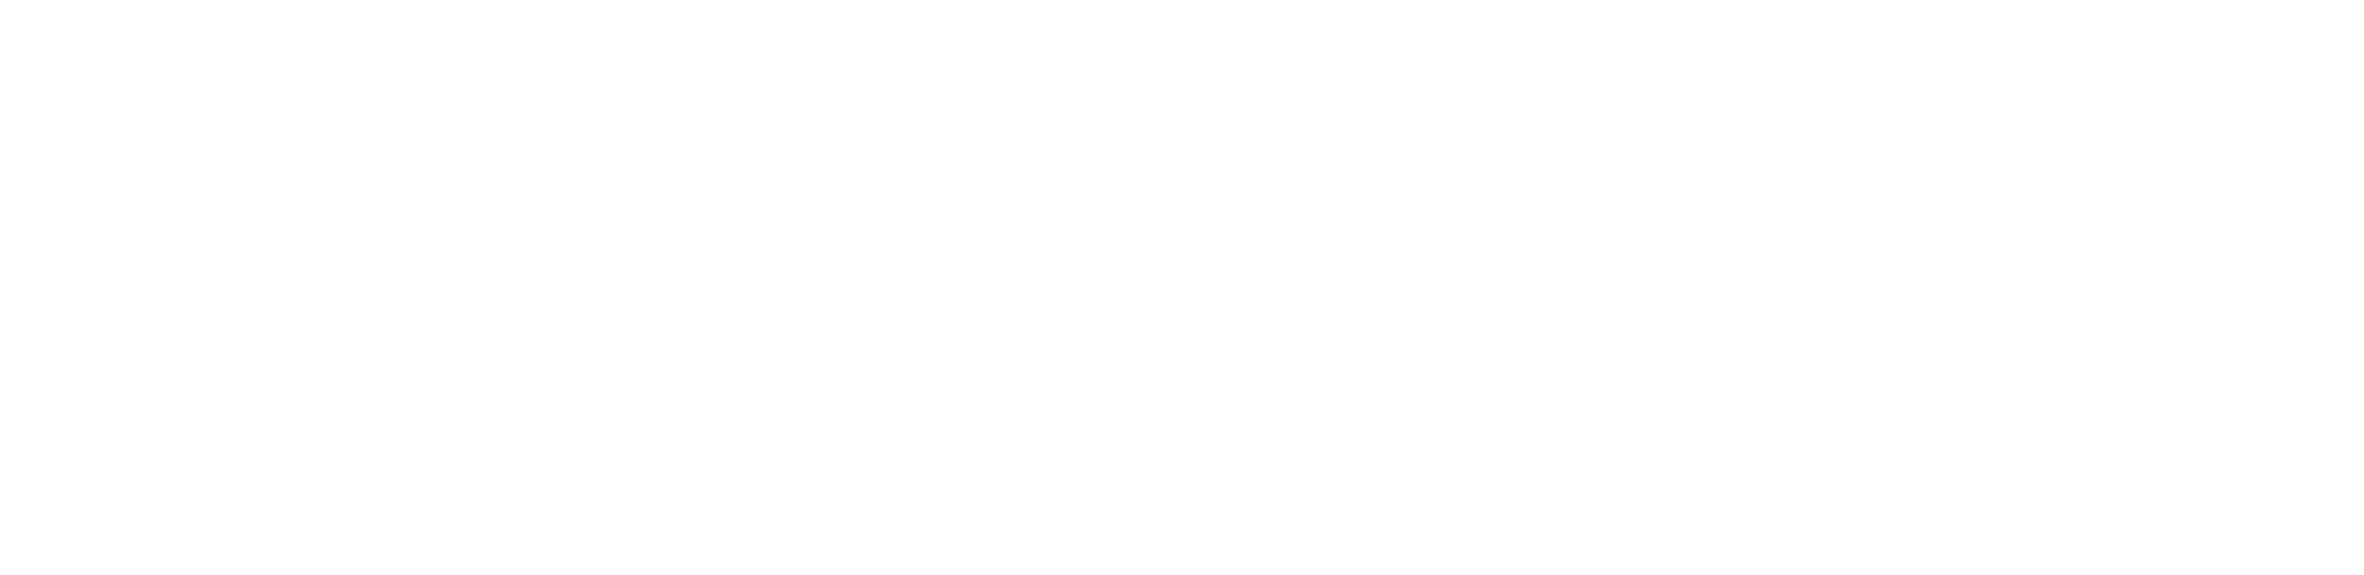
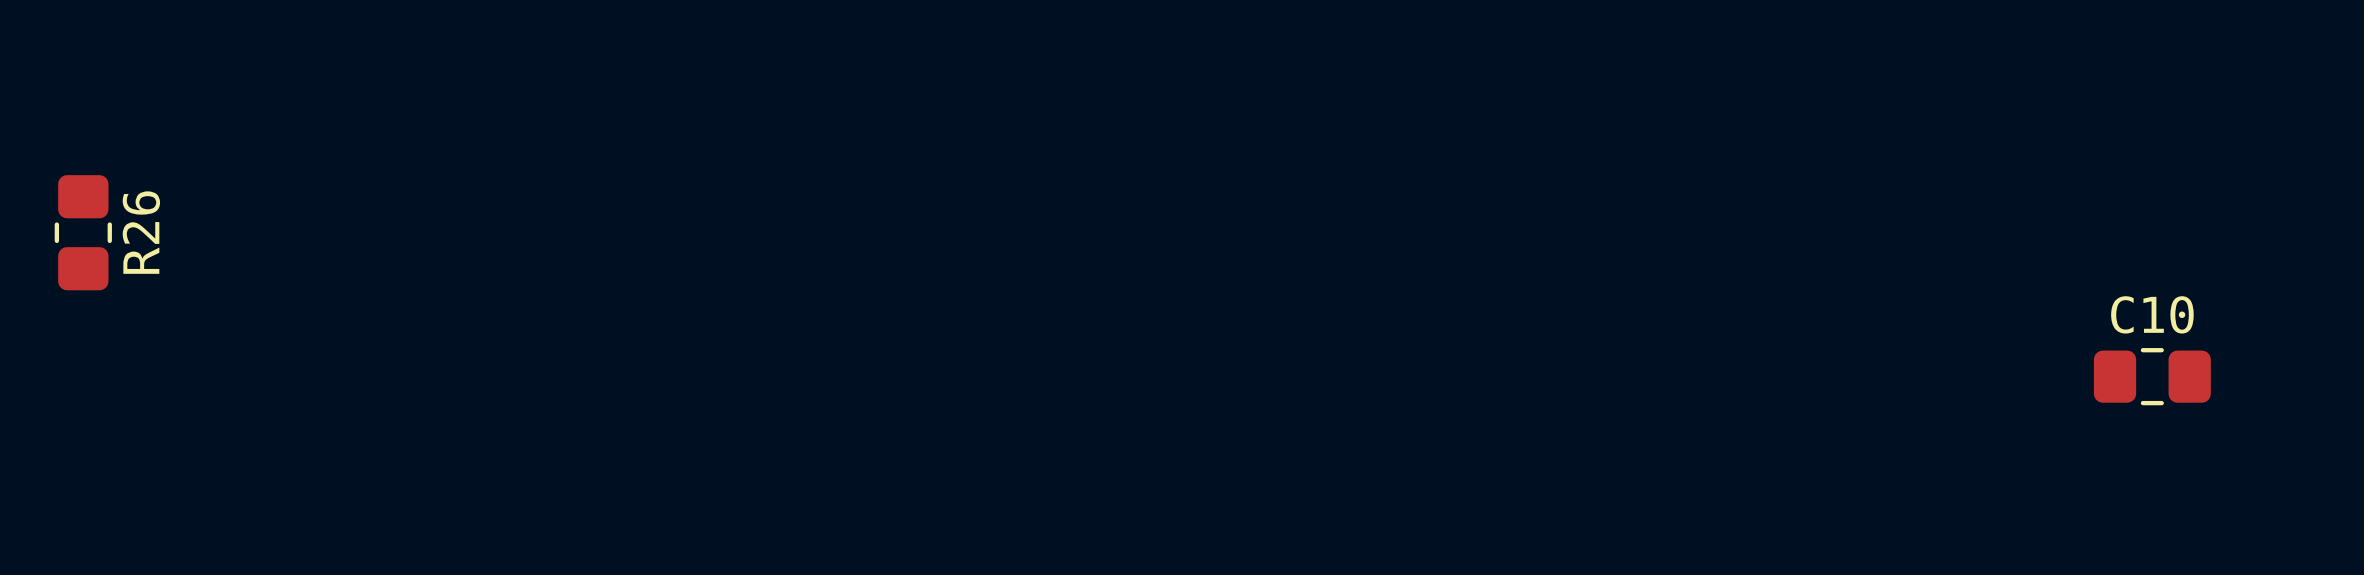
R26: none -> (83, 232)
C10: none -> (2152, 376)

